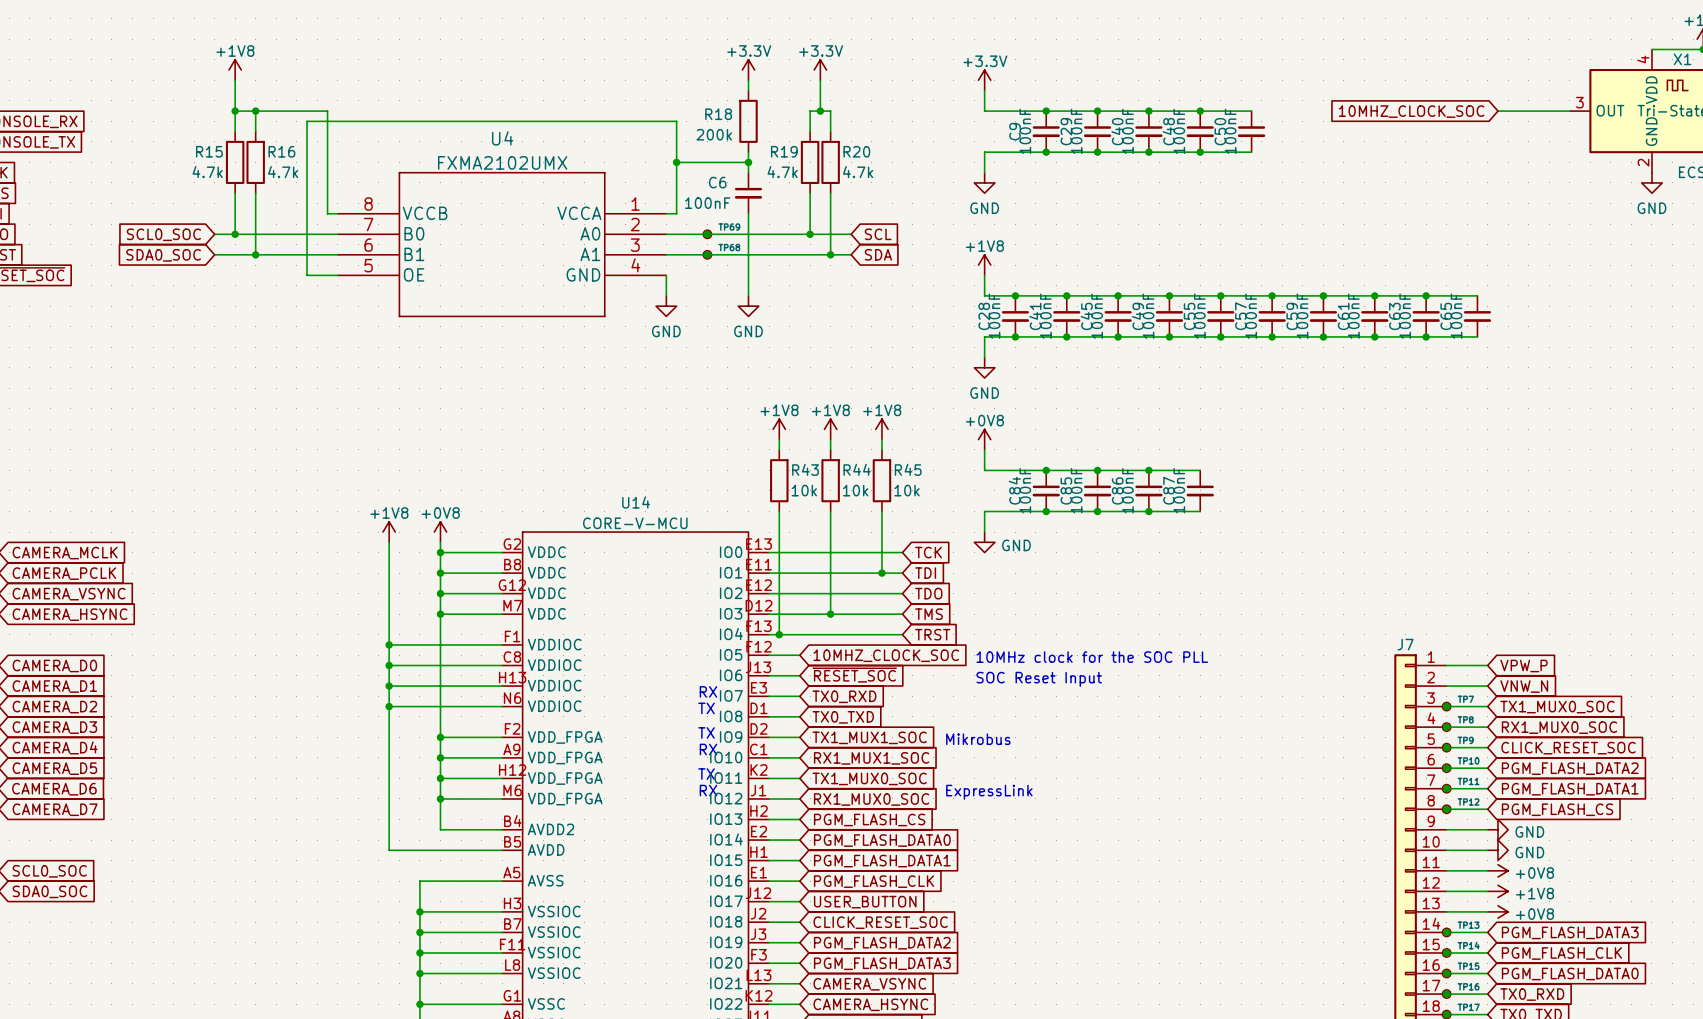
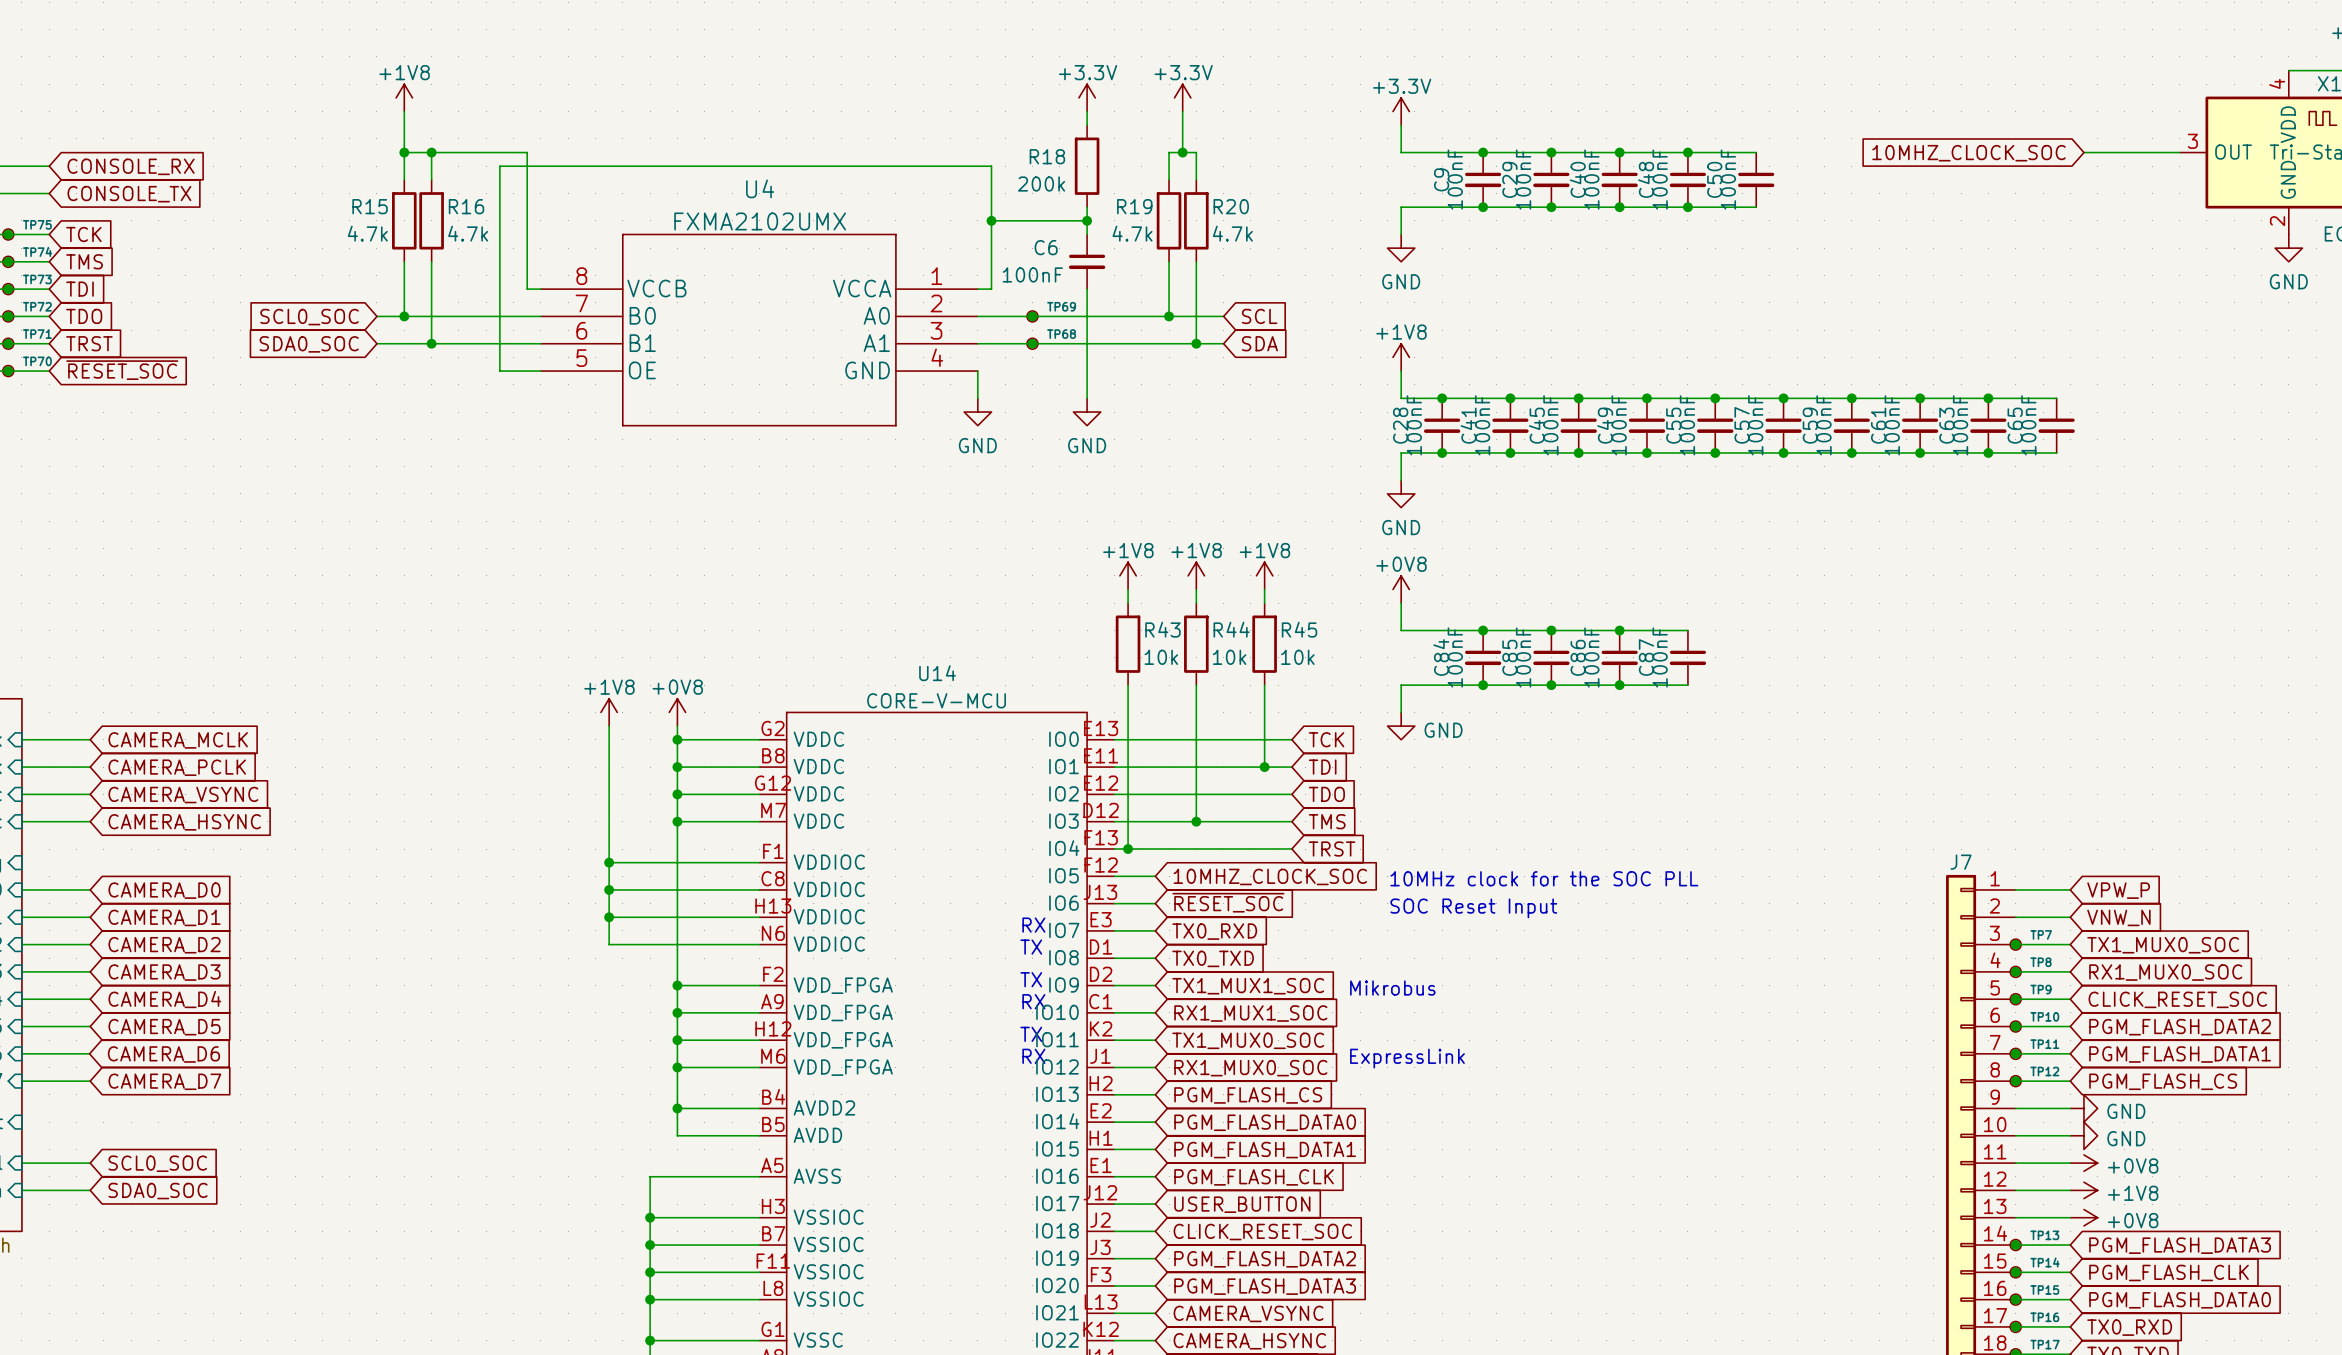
wire: (389, 706) (389, 850) (440, 850) -> (677, 1108) (677, 1135)
junction: (389, 706) -> none
junction: none -> (677, 1108)

